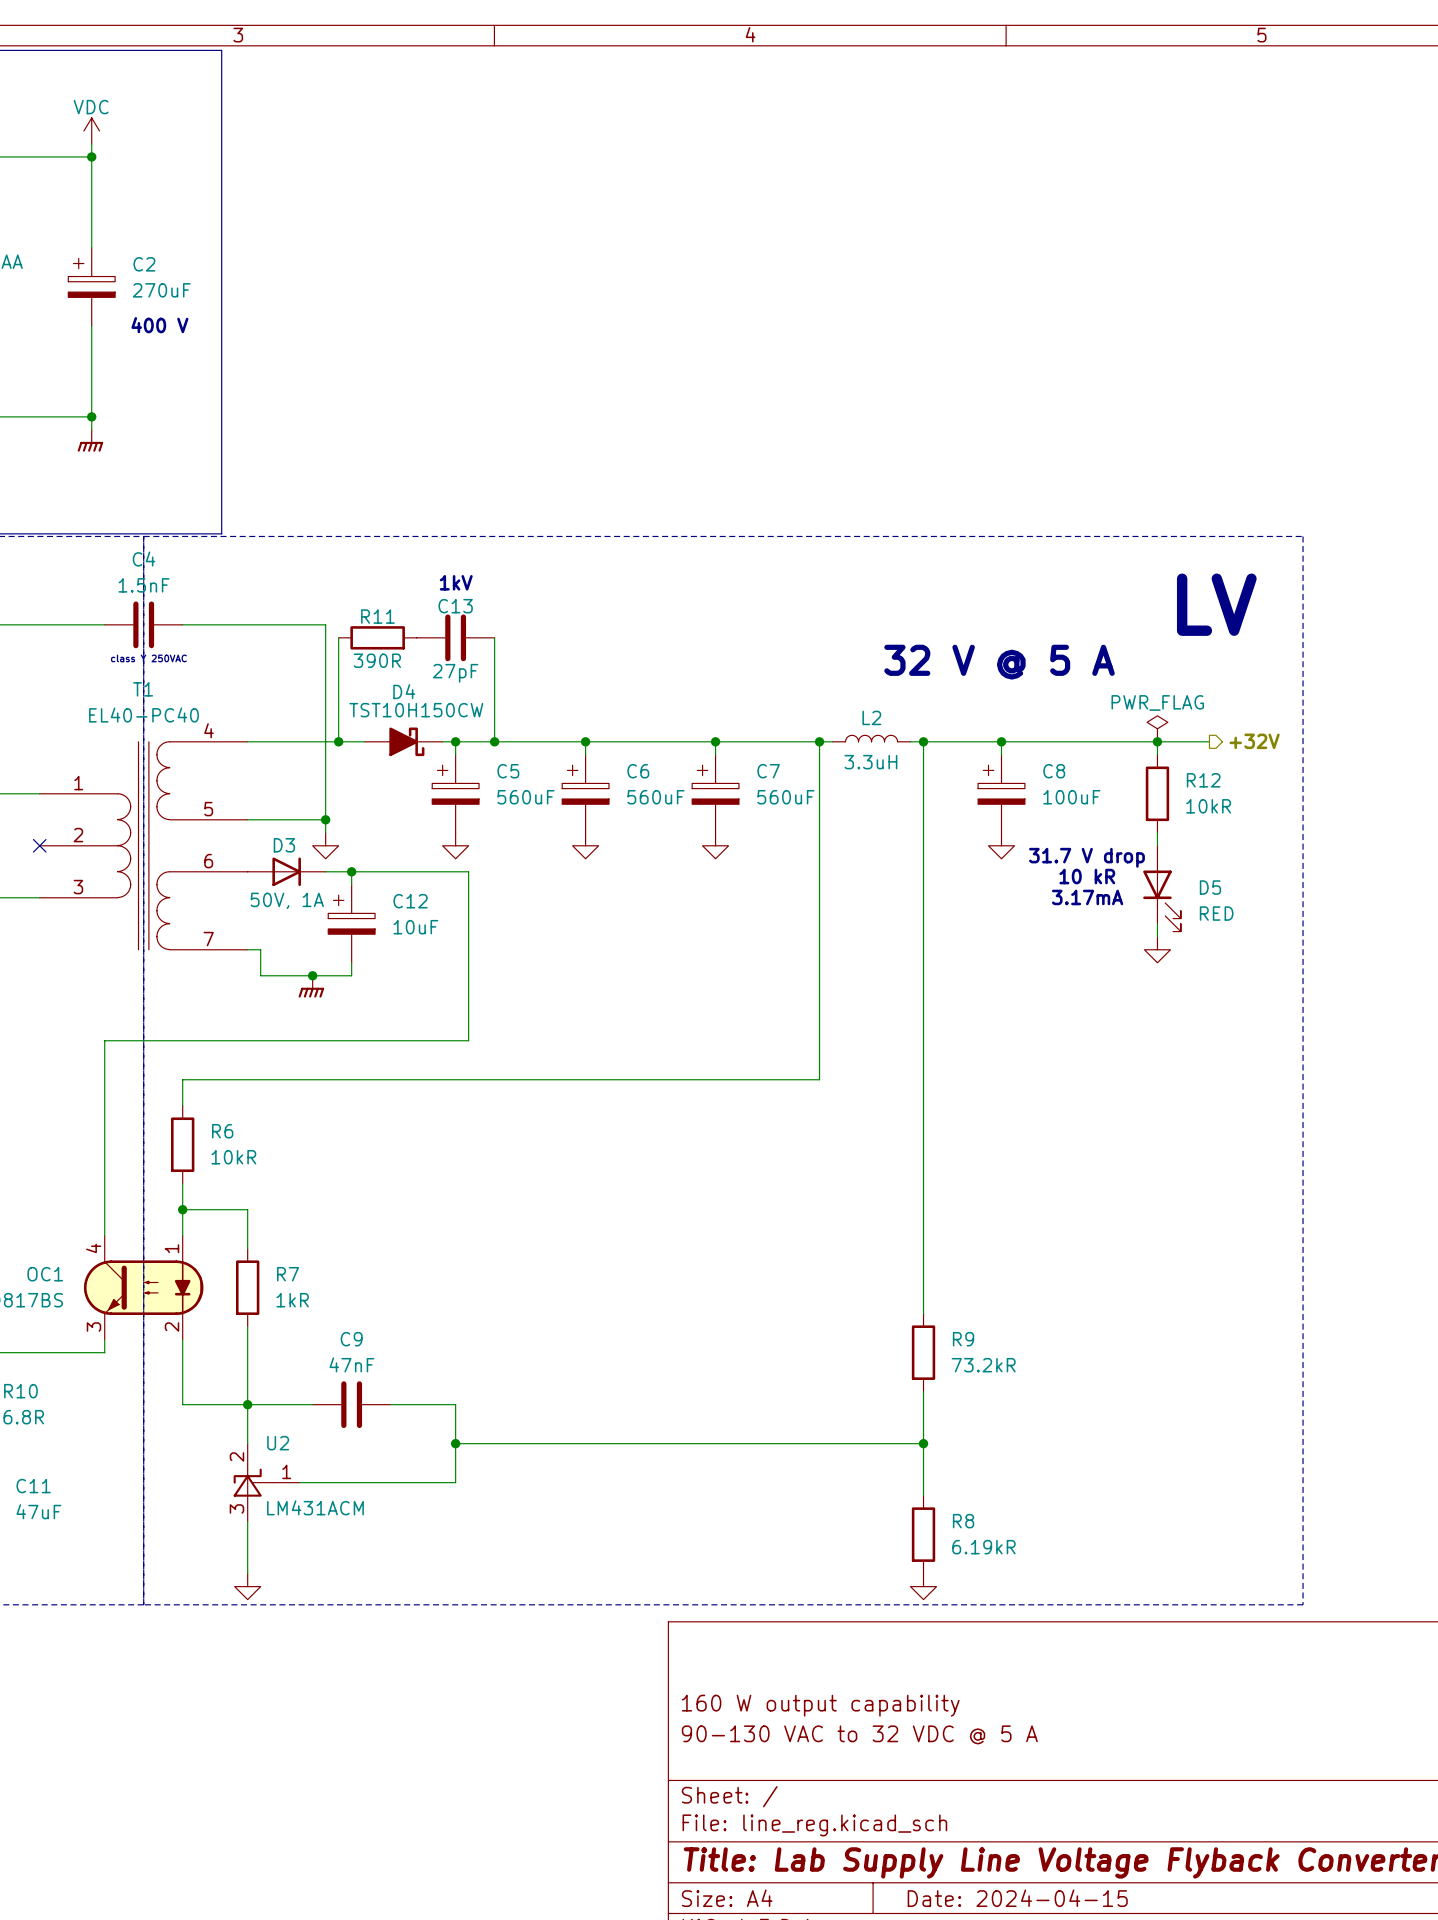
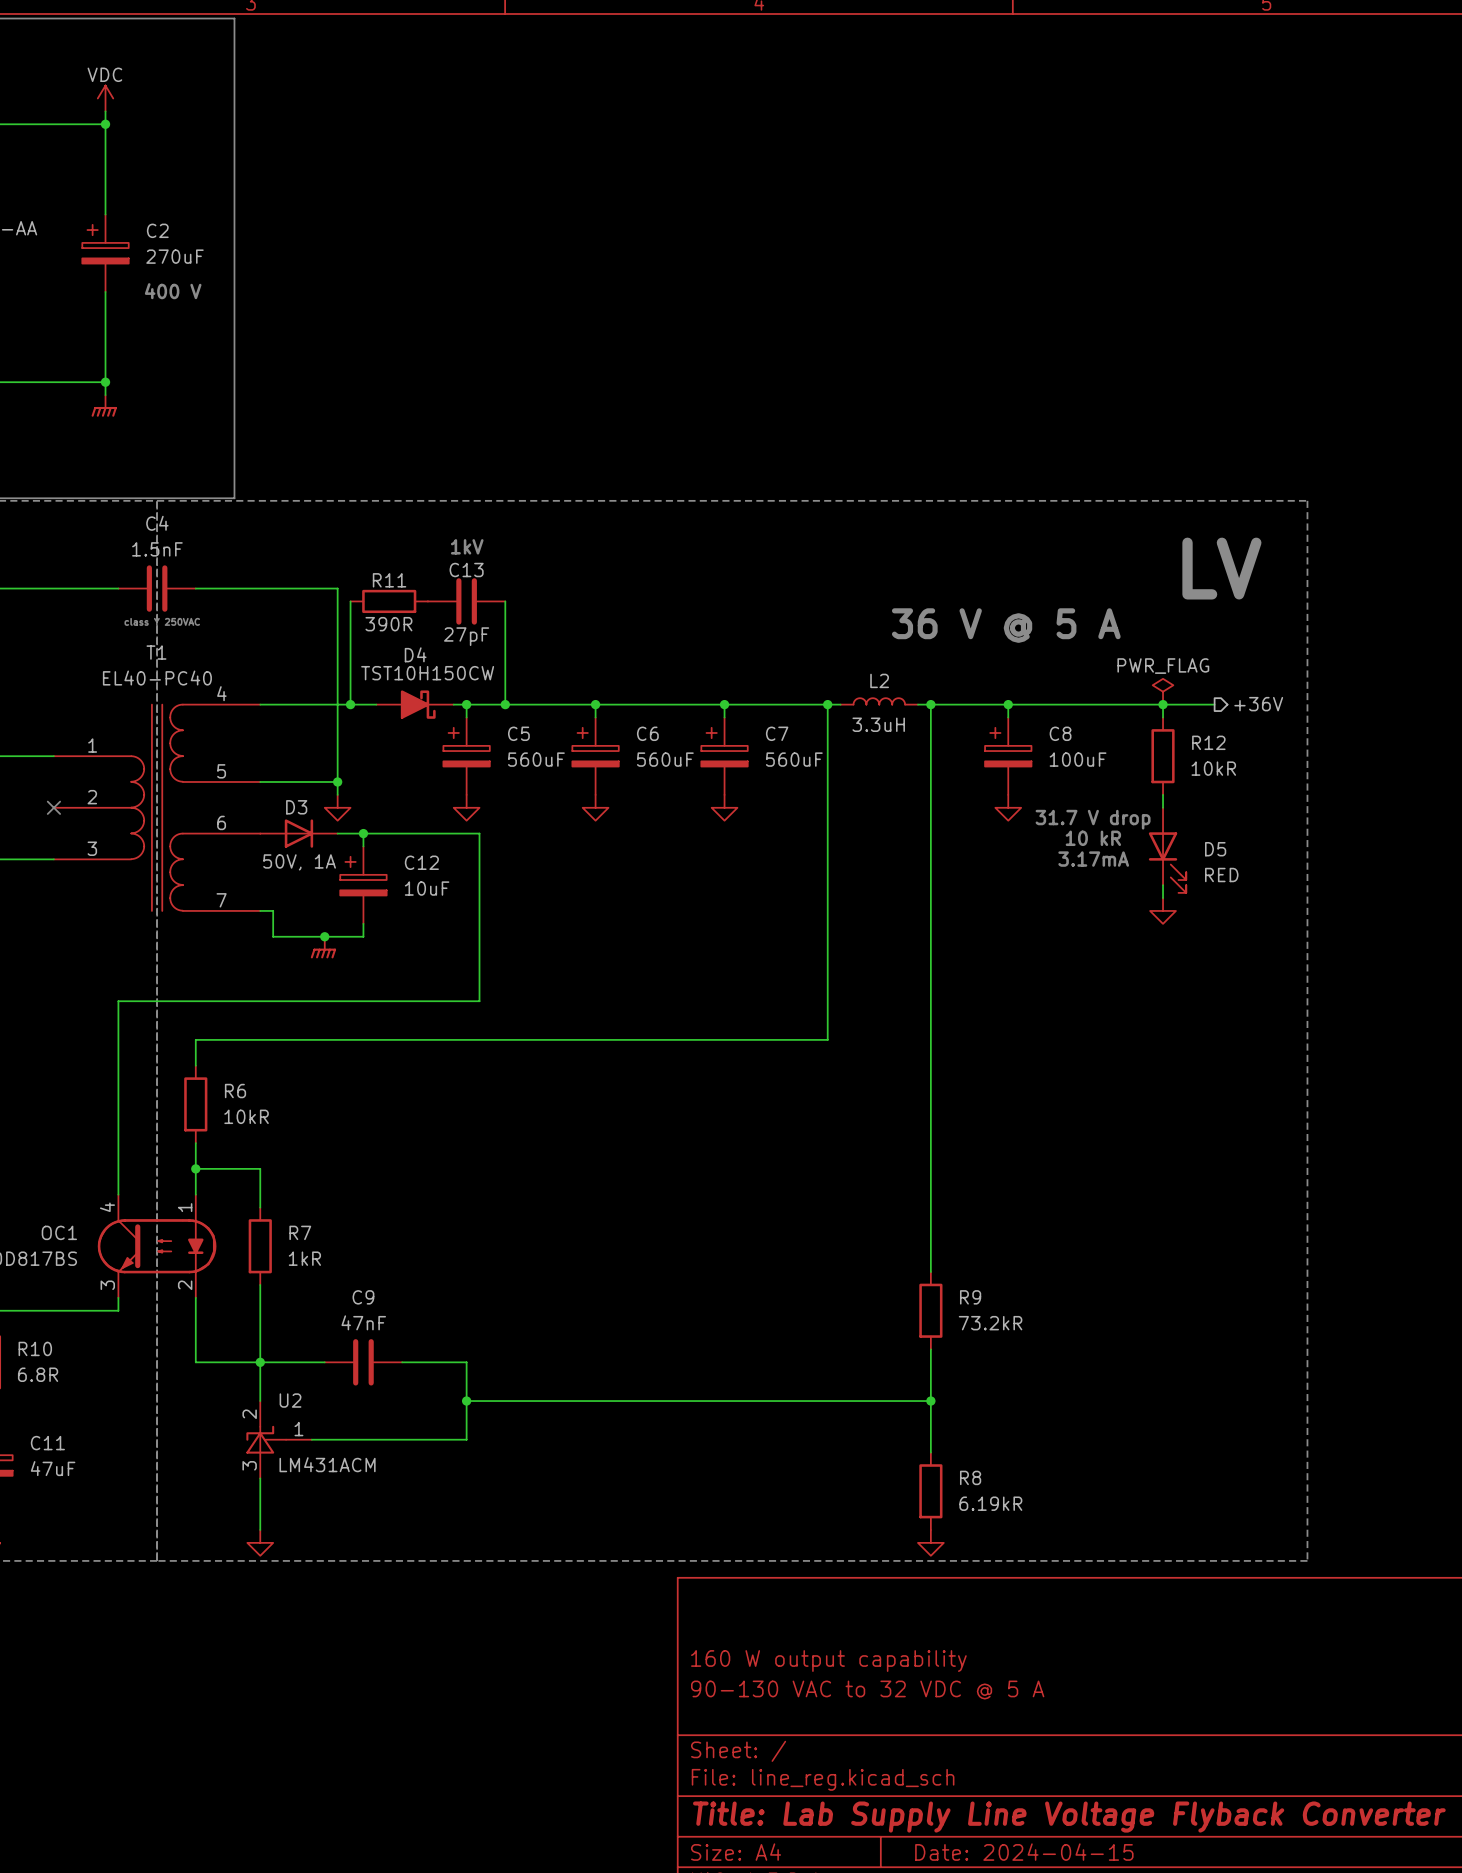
text: 32 V @ 5 A (999, 662) -> 36 V @ 5 A (1006, 625)
hierarchical label: +32V (1254, 741) -> +36V (1258, 704)

